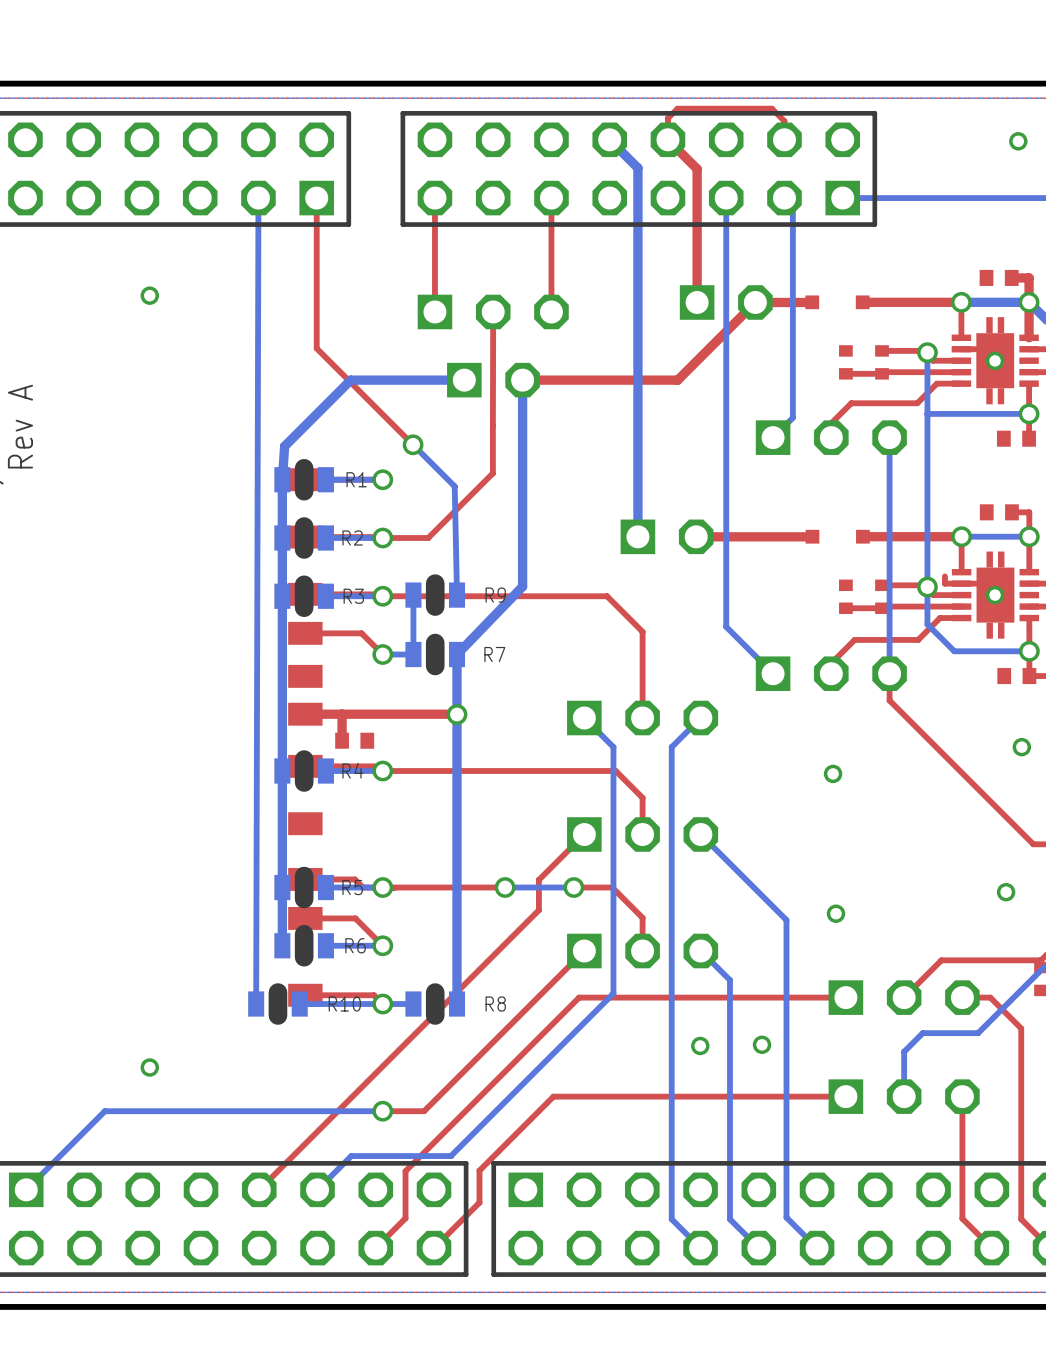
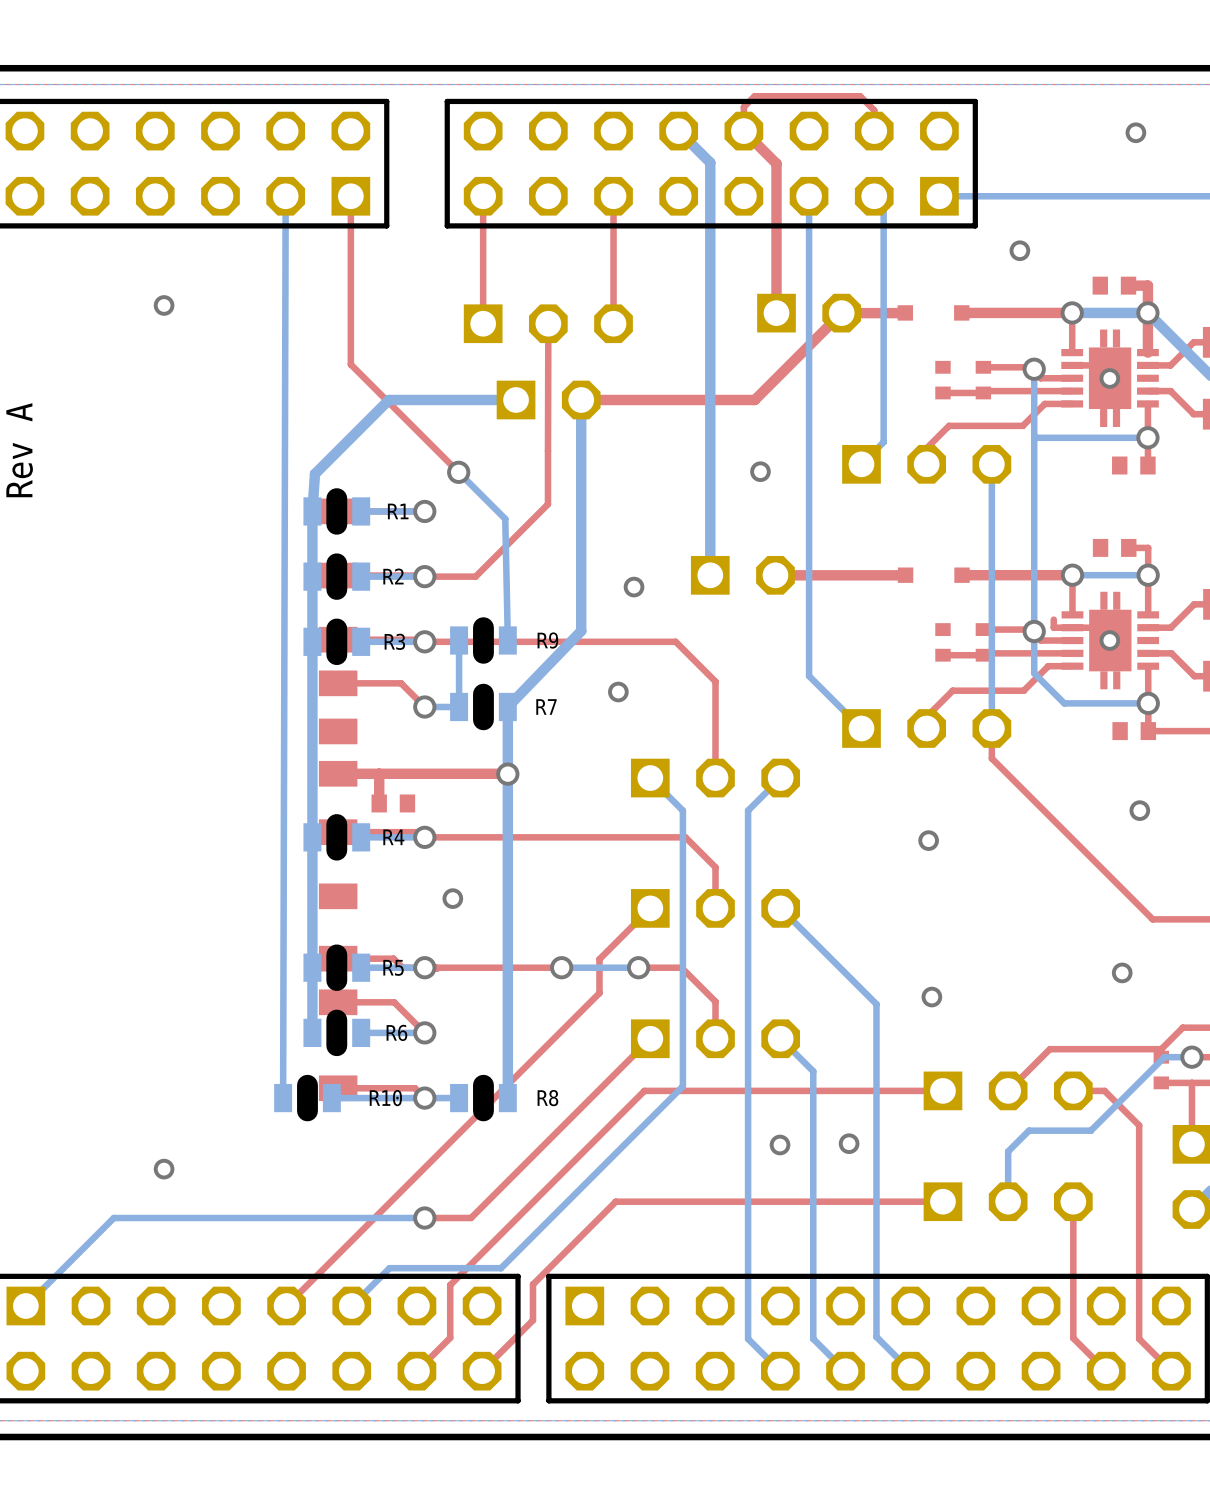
via: none -> (1019, 250)
via: none -> (760, 471)
via: none -> (634, 587)
via: none -> (618, 692)
via: none -> (452, 898)

